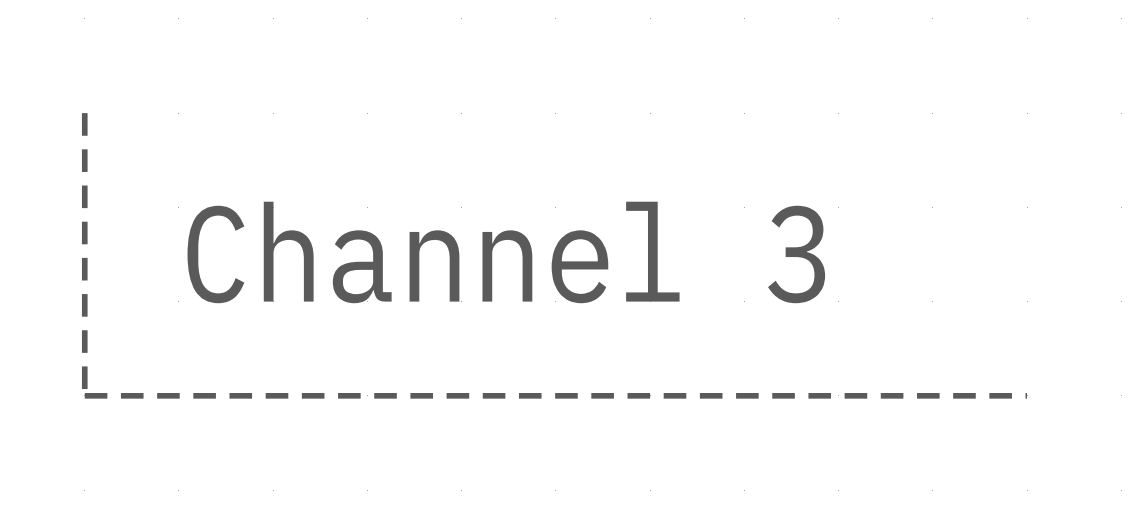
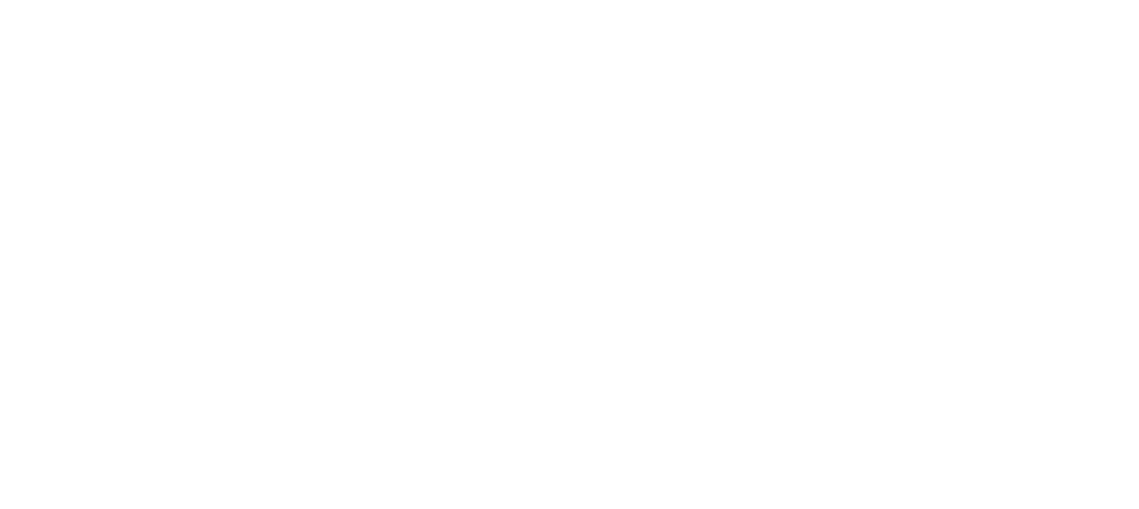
line: (84, 113) (84, 395) (1027, 395) -> none
text: Channel 3 (506, 252) -> none

